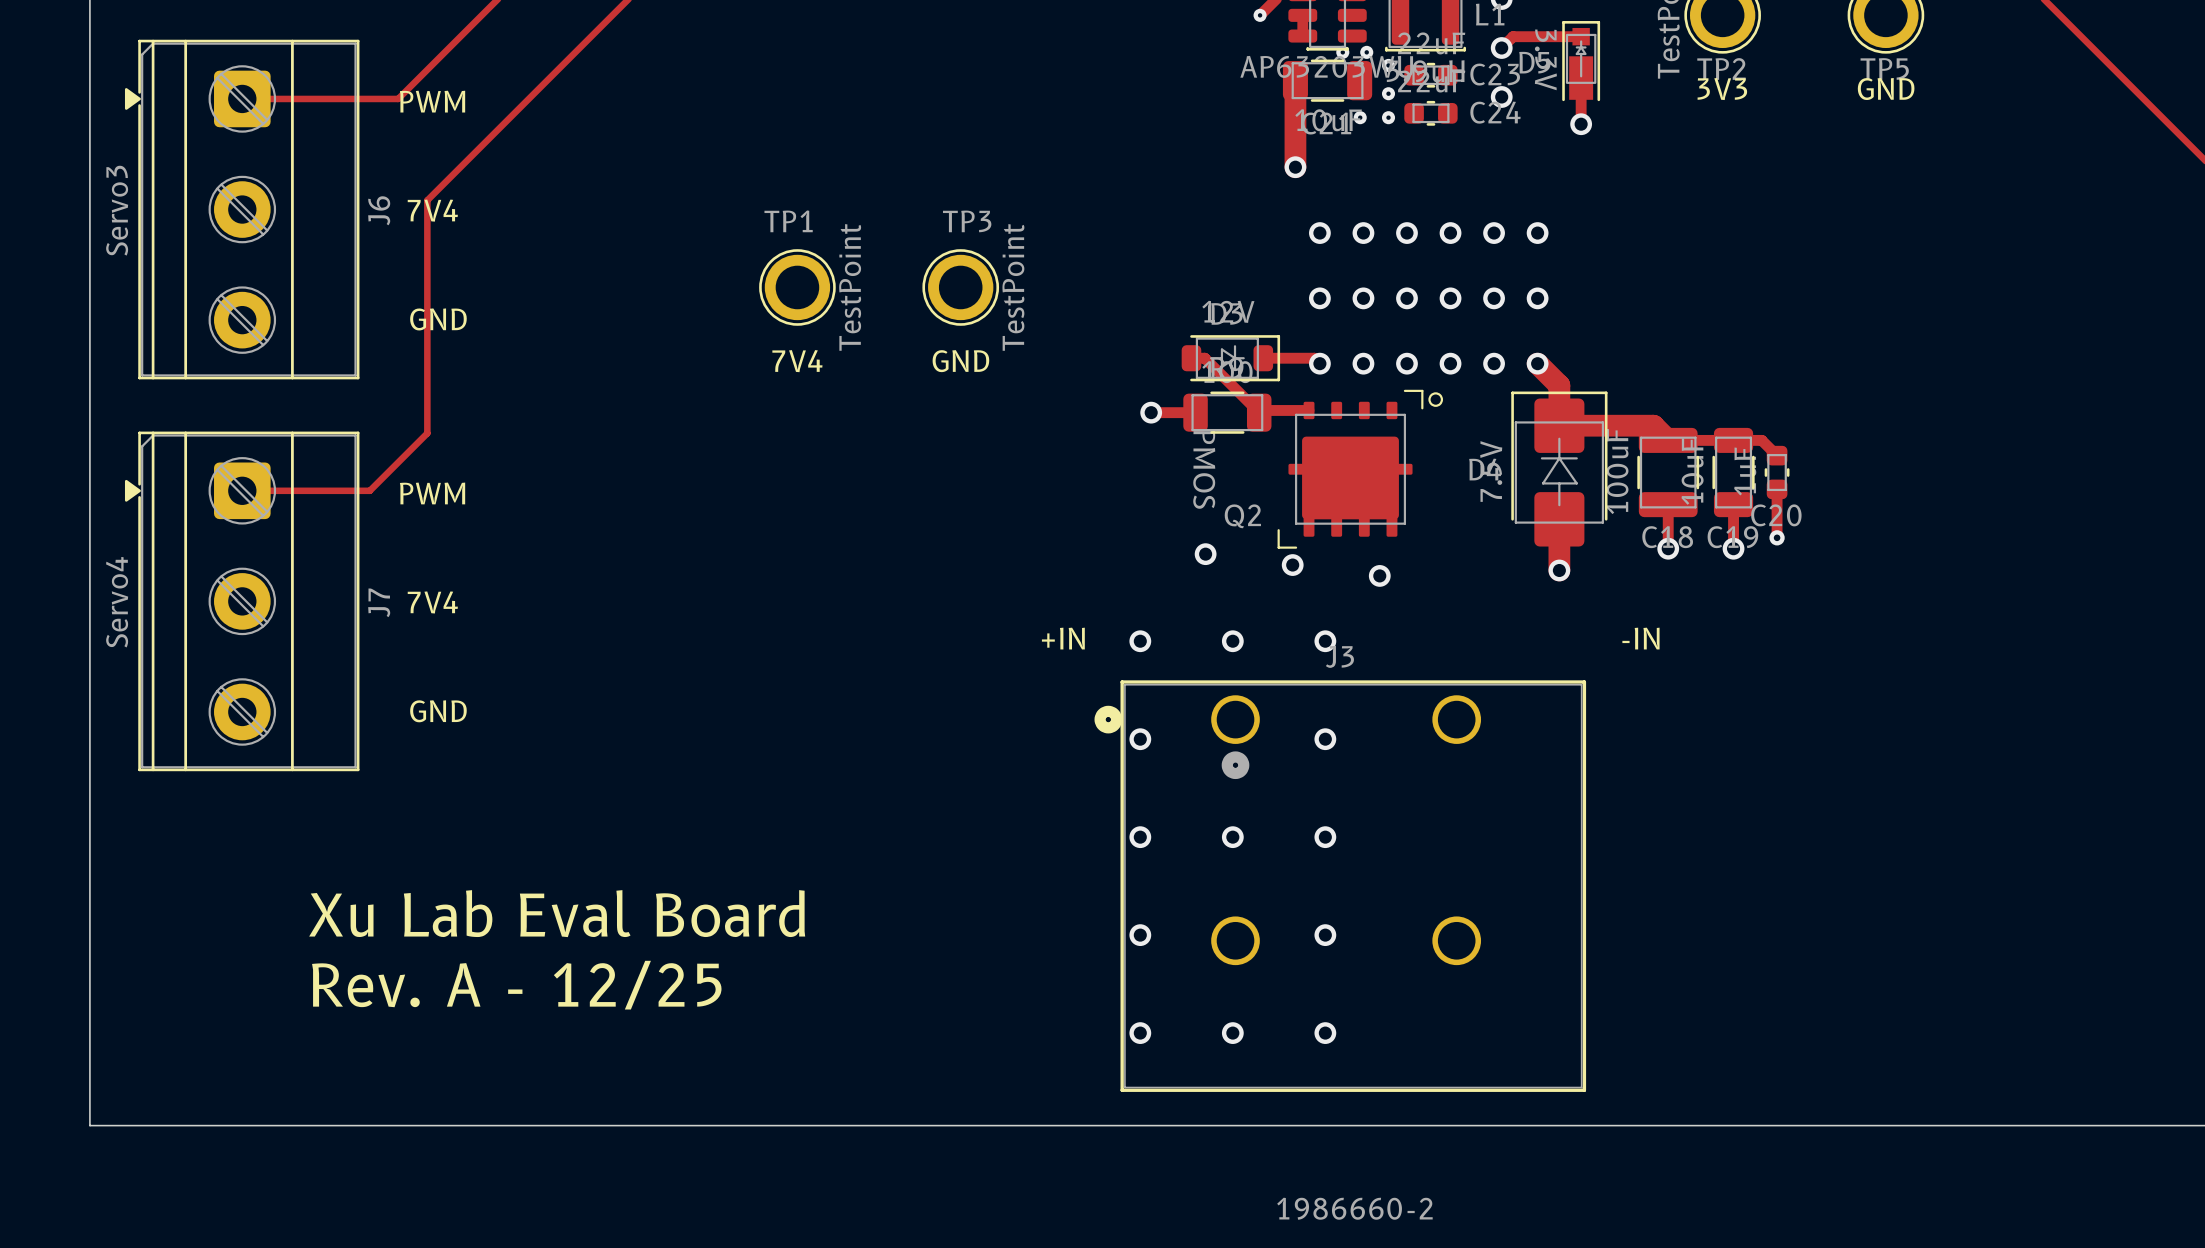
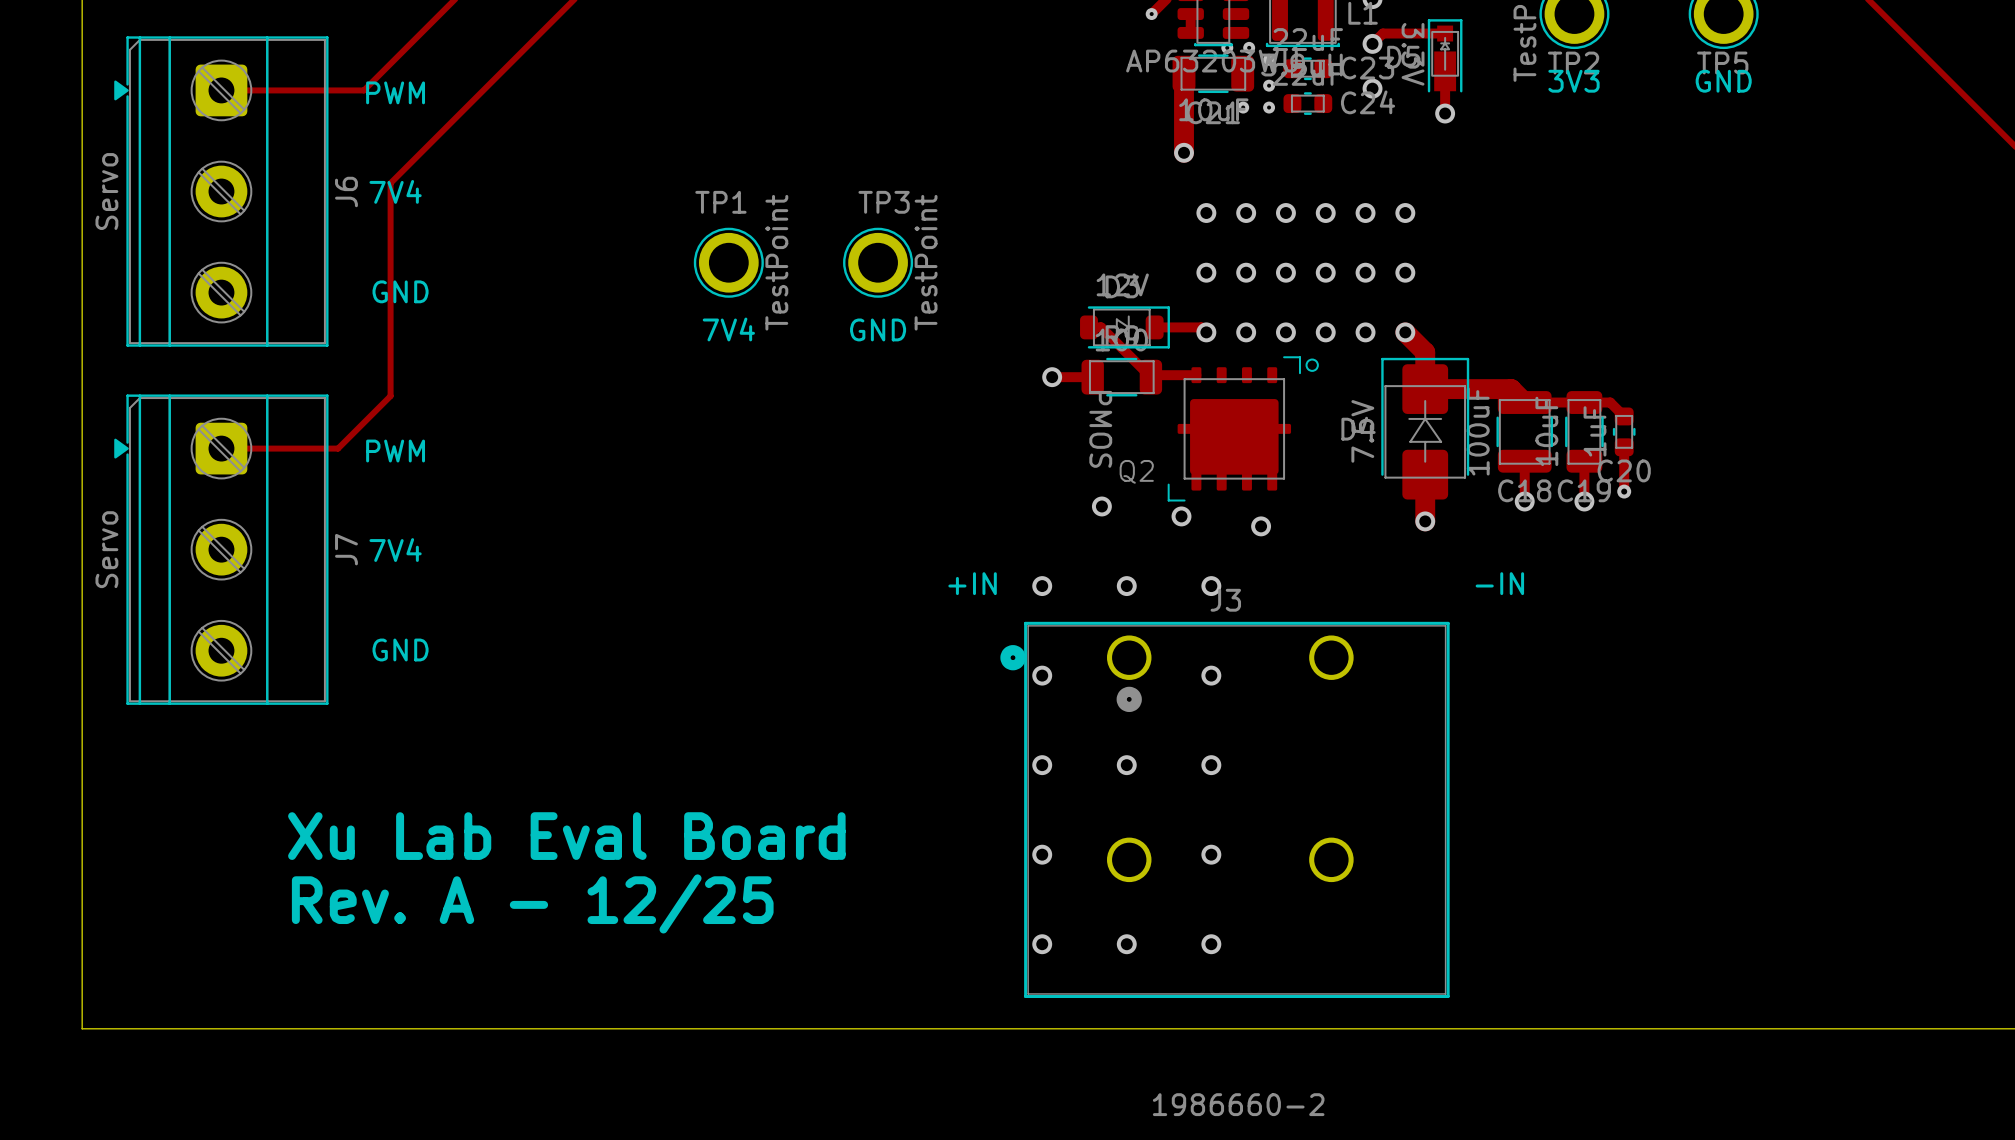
J6 value: Servo3 (117, 210) -> Servo (106, 191)
J7 value: Servo4 (117, 602) -> Servo (106, 549)

